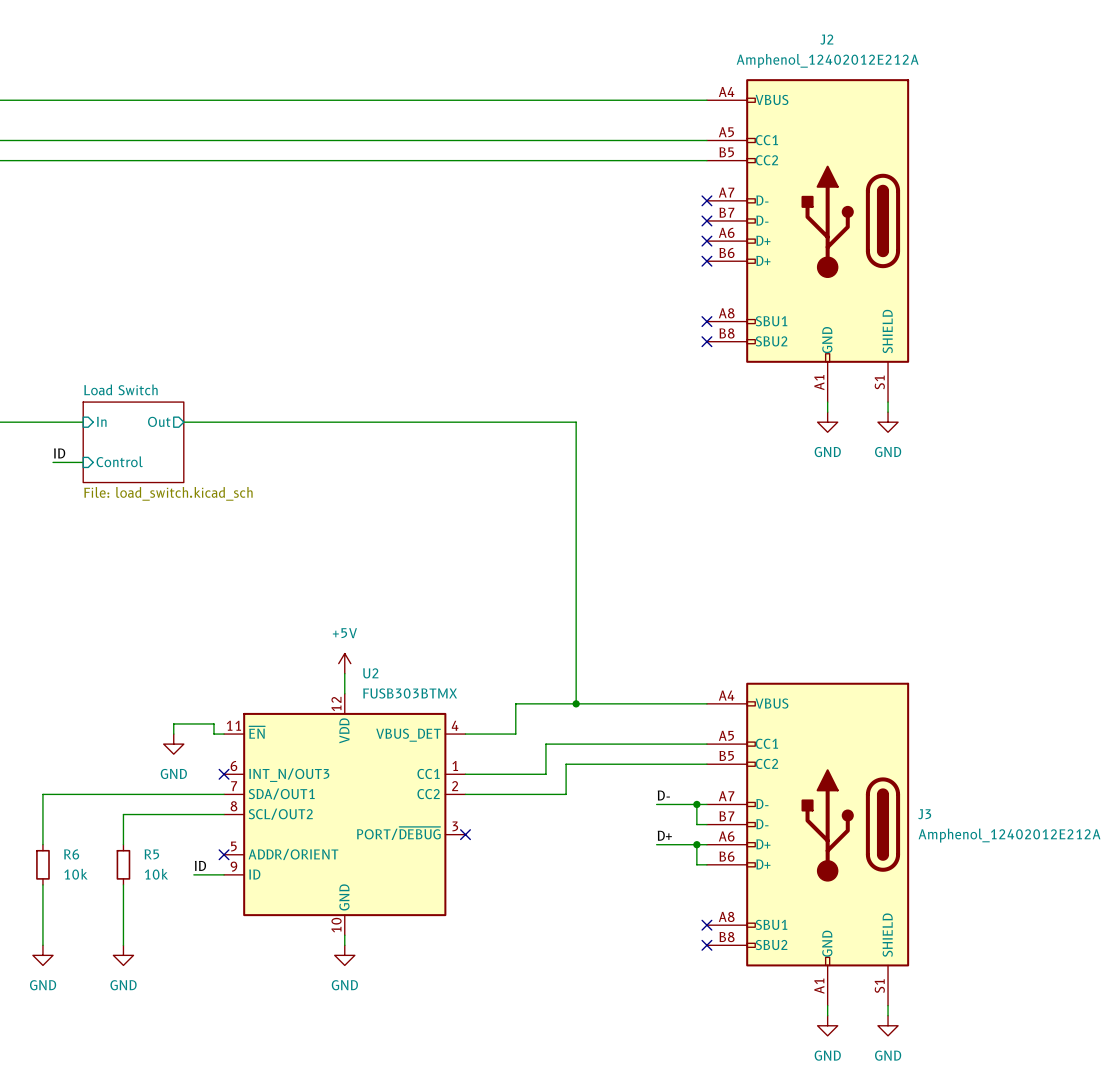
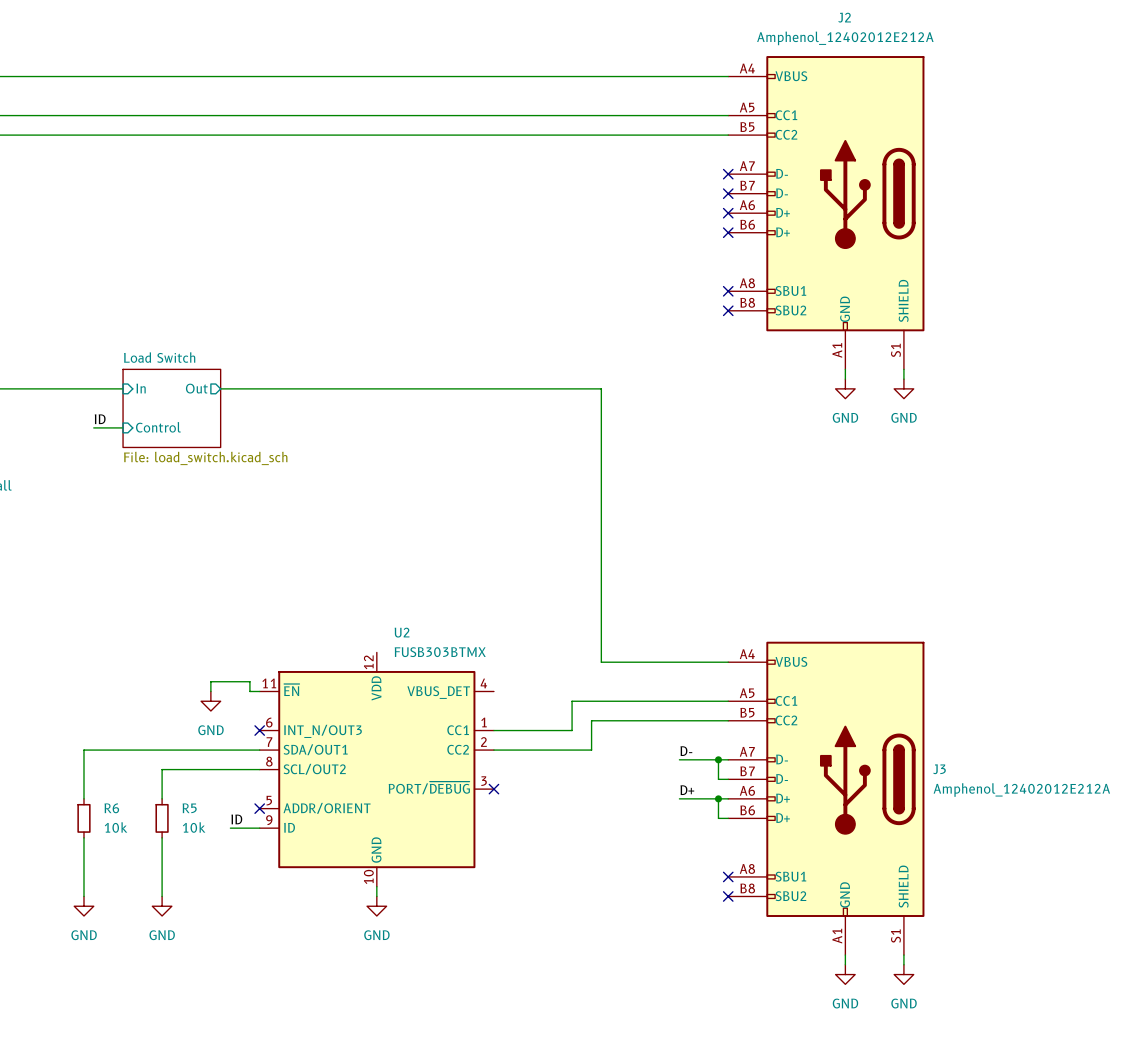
power symbol: +5V (344, 663) -> none
wire: (344, 673) (344, 693) -> none
wire: (576, 703) (515, 703) (515, 734) (465, 734) -> none
junction: (576, 703) -> none

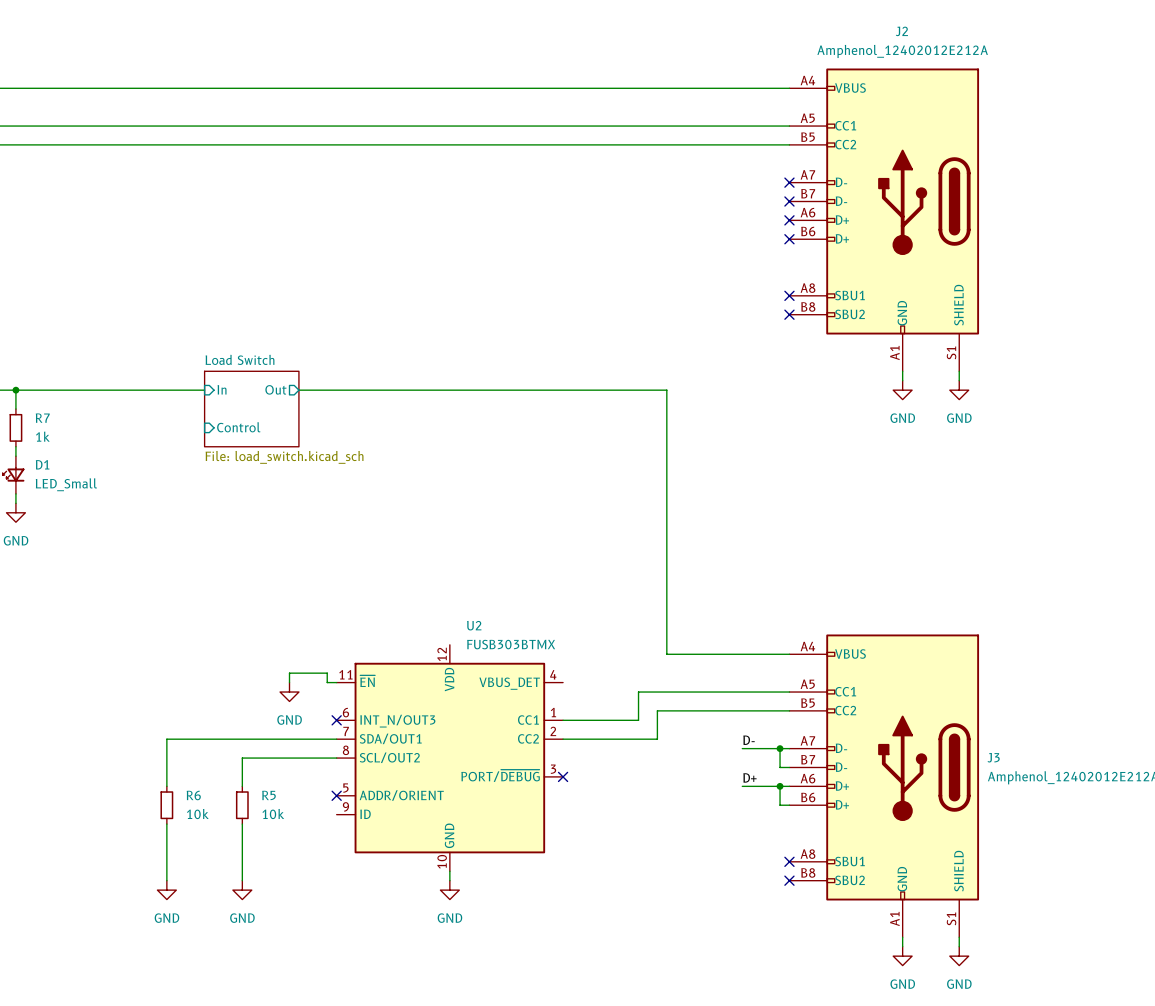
label: ID (100, 419) -> none
wire: (93, 427) (123, 427) -> none
label: ID (236, 819) -> none
wire: (230, 828) (259, 828) -> none

